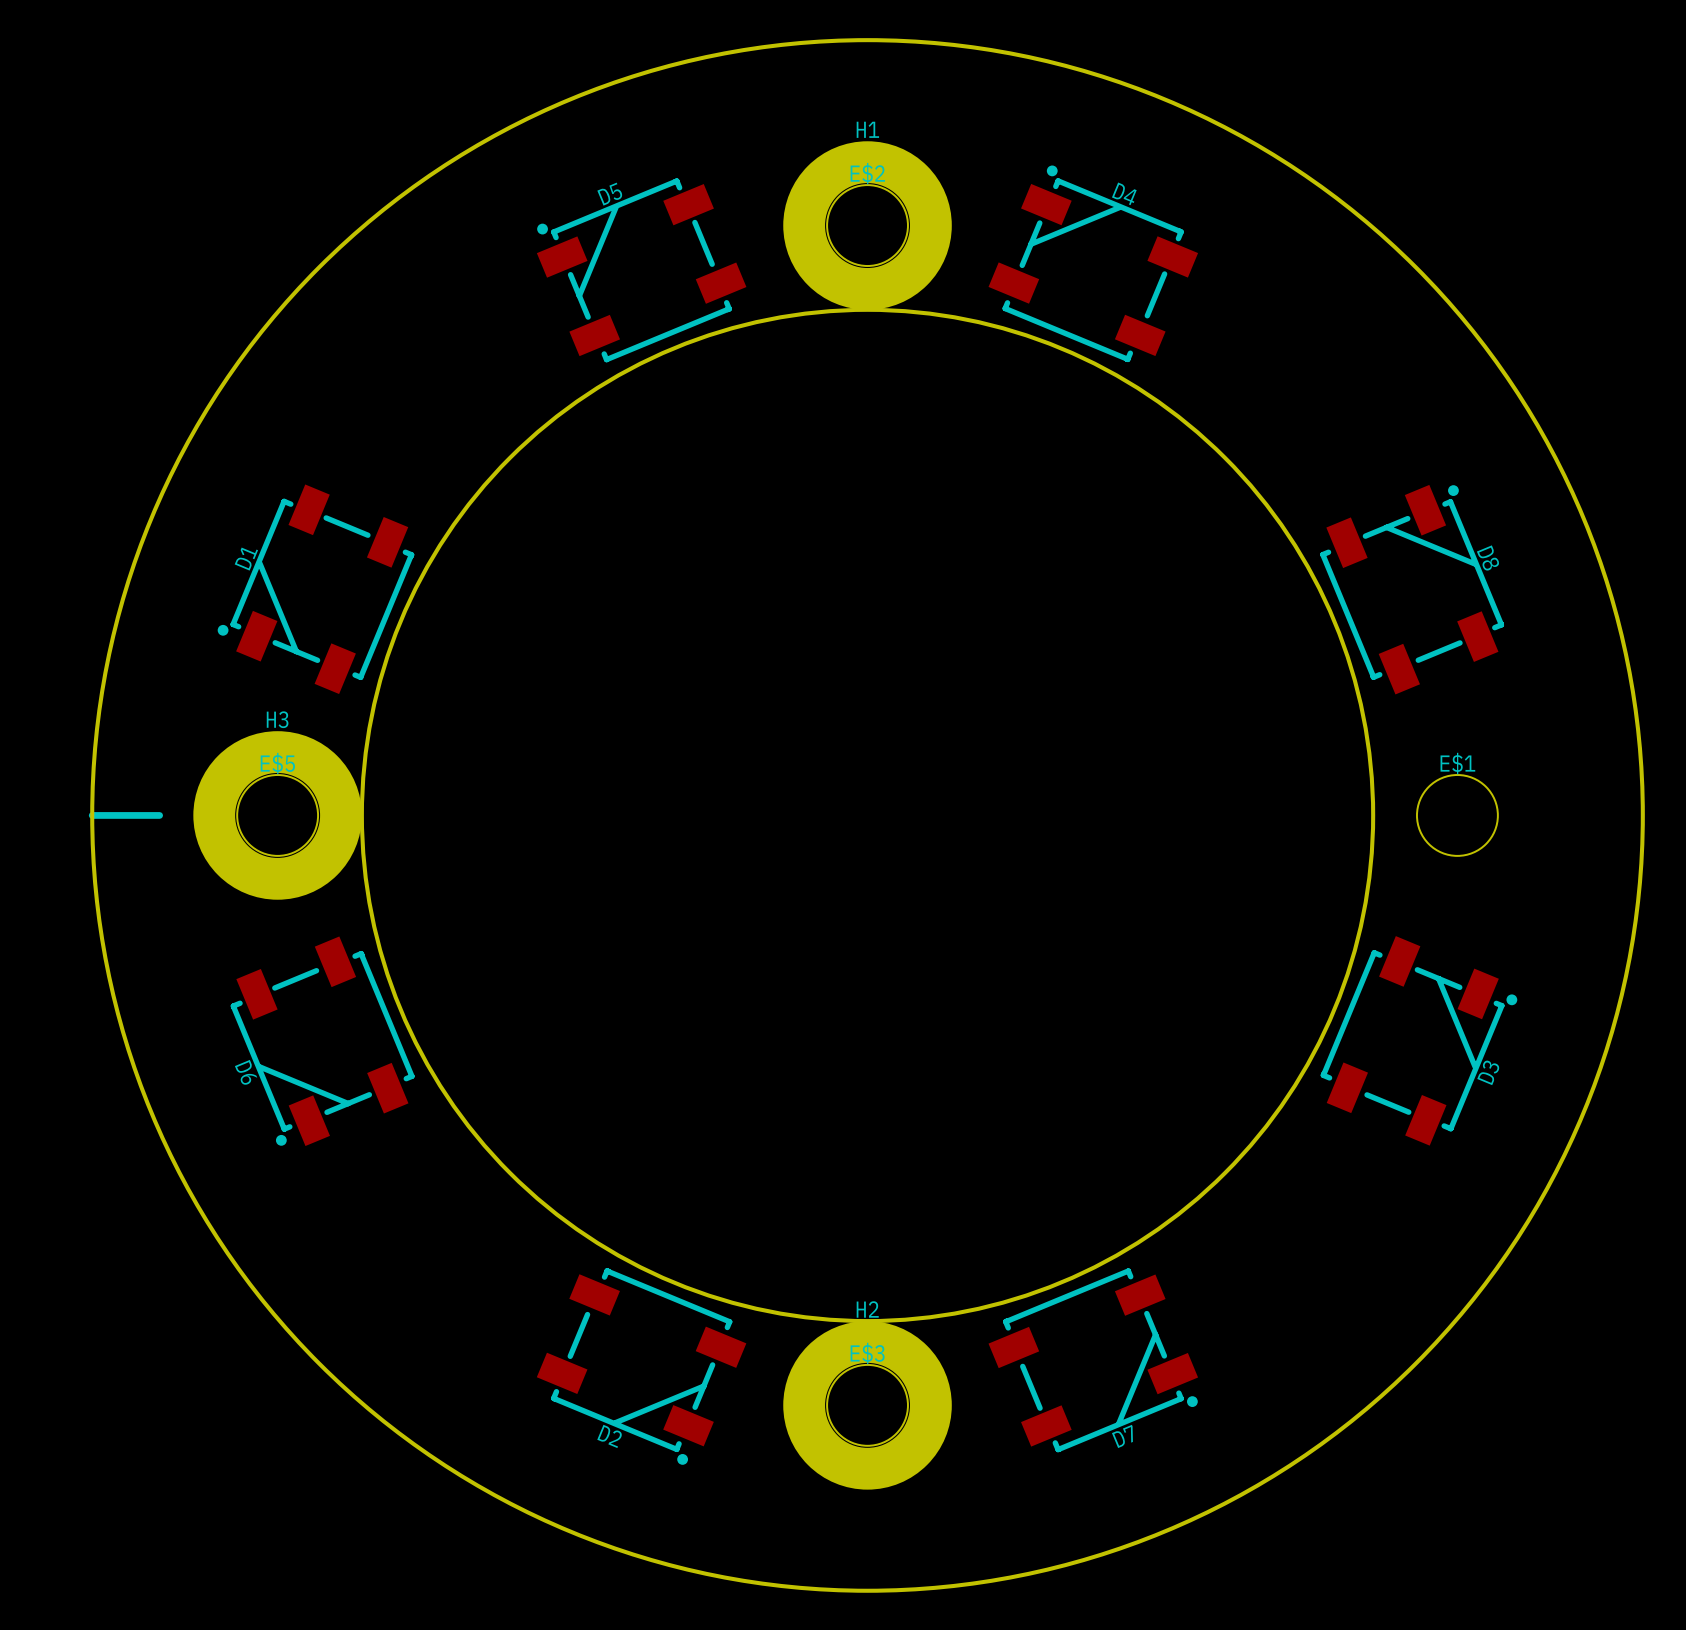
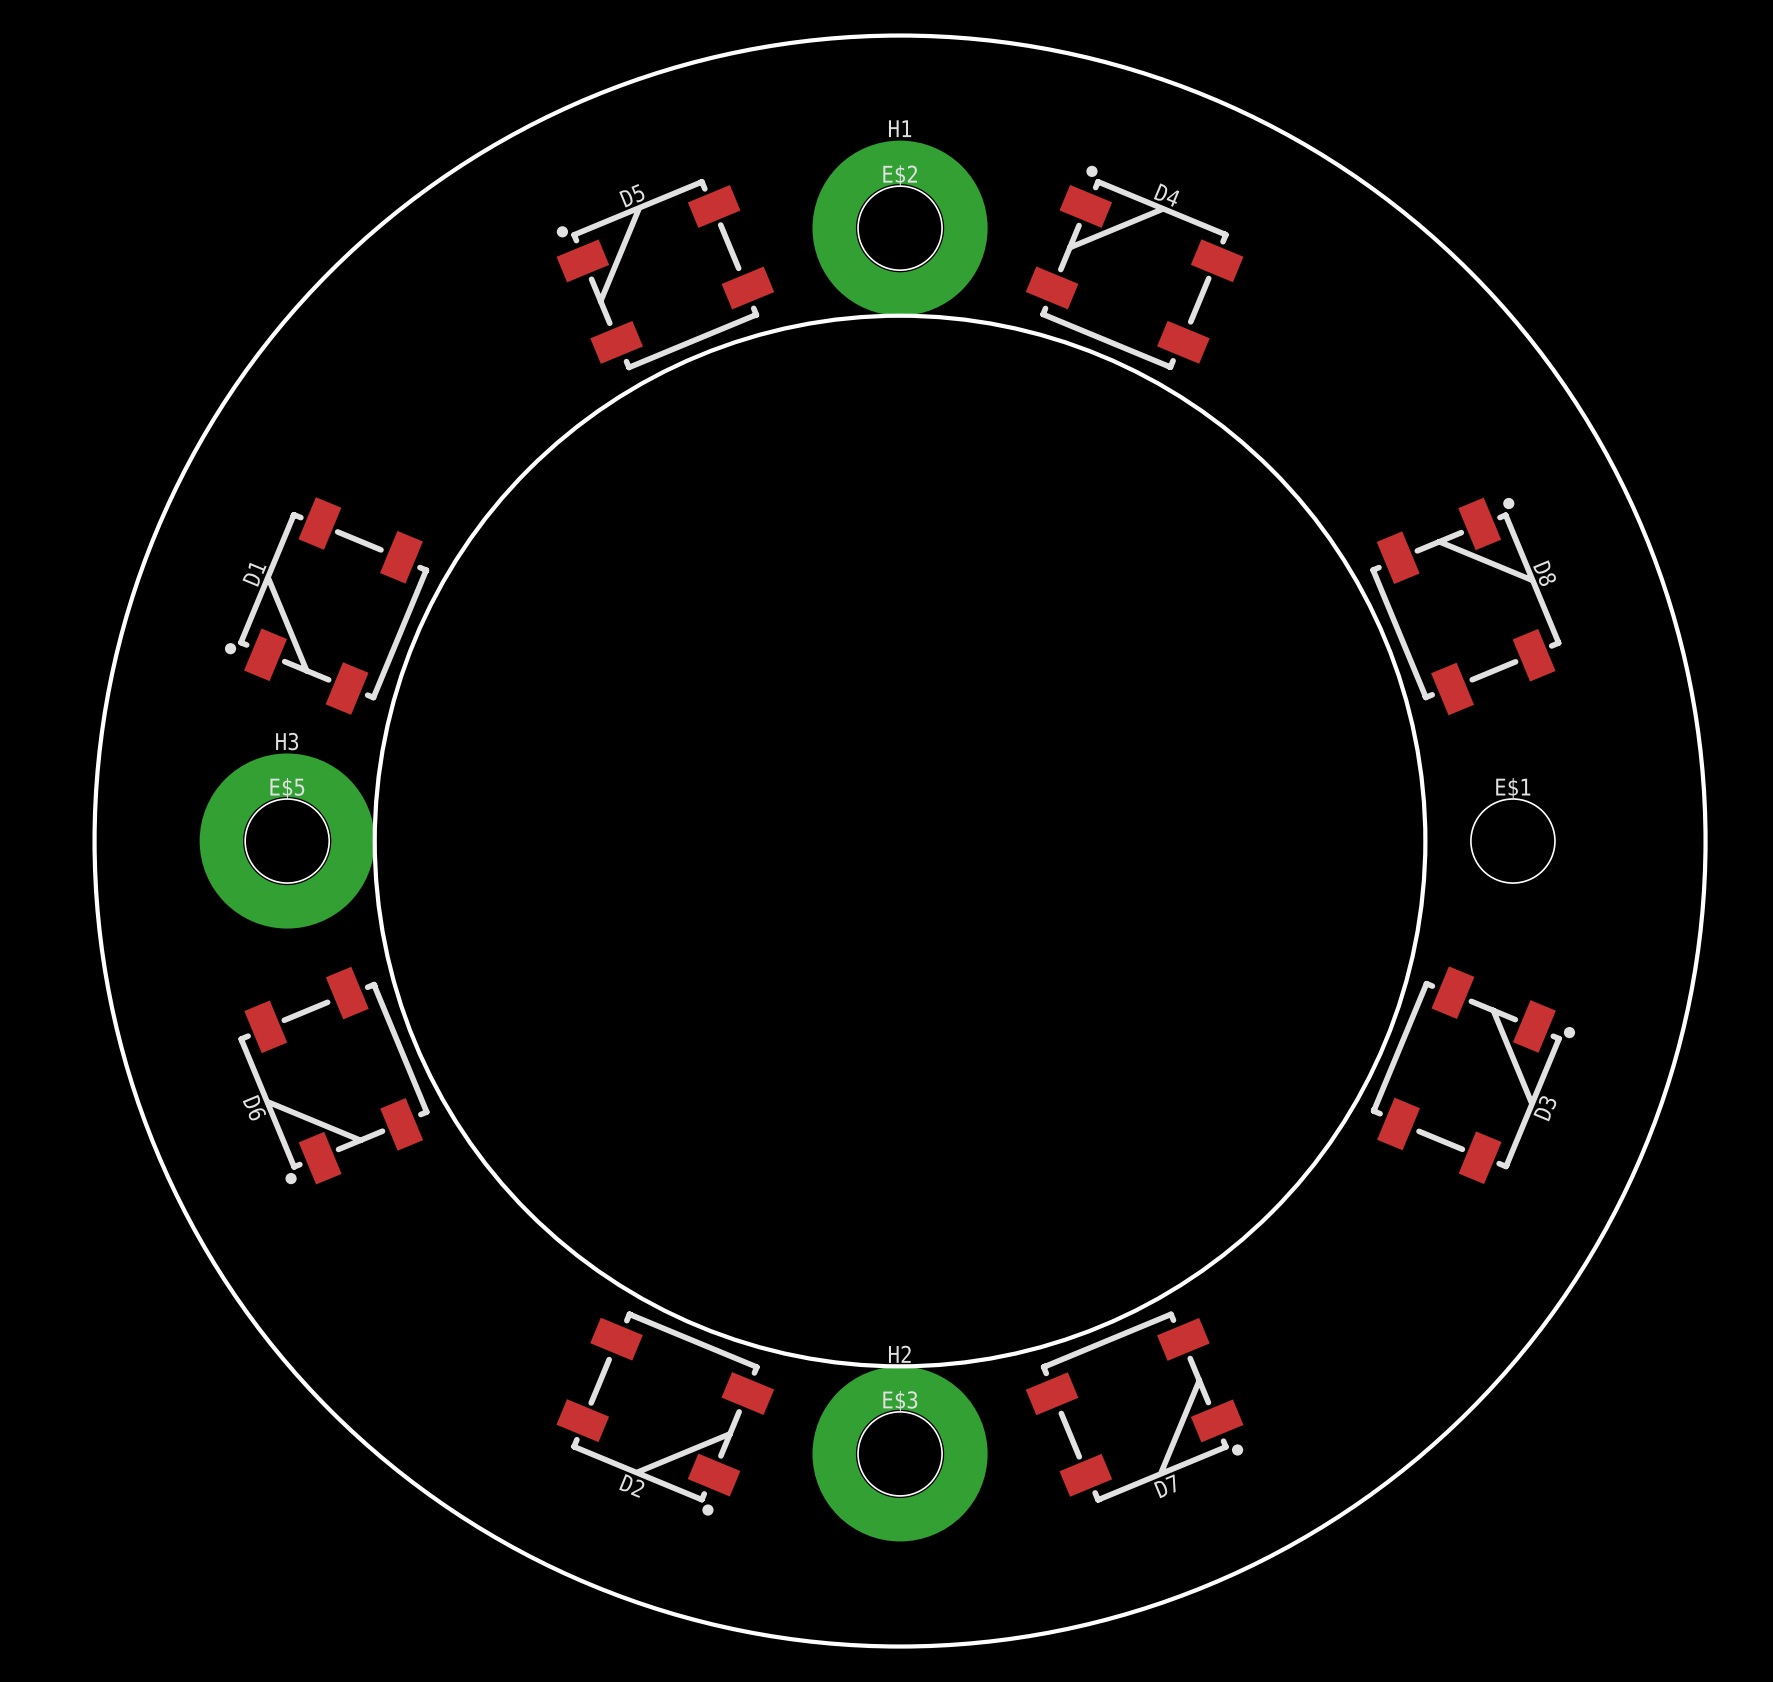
line: (92, 815) (159, 815) -> none

